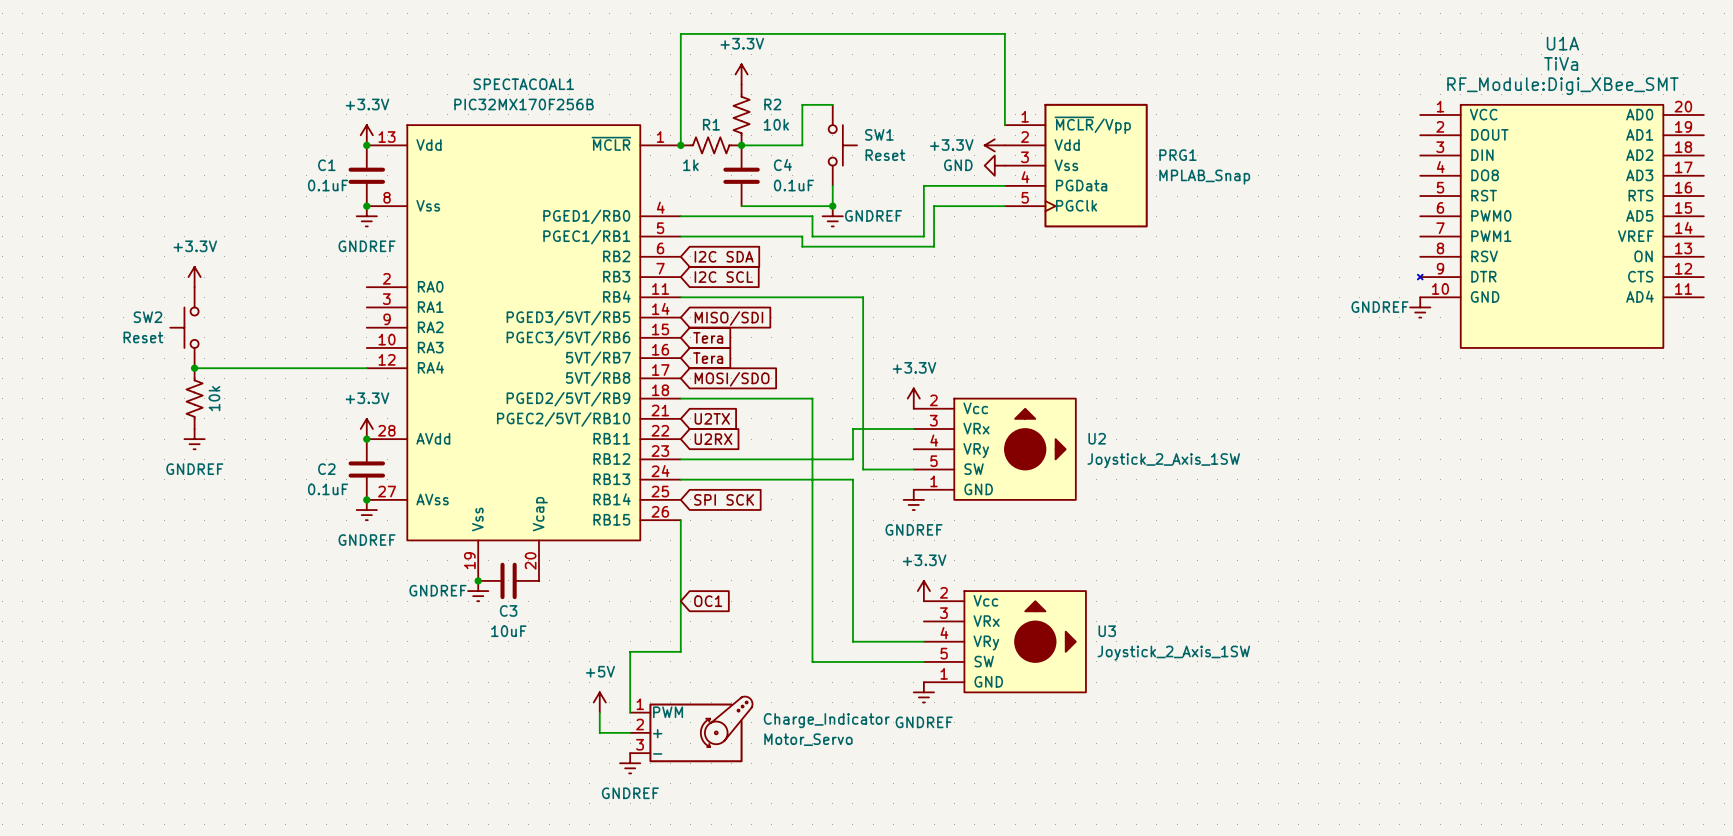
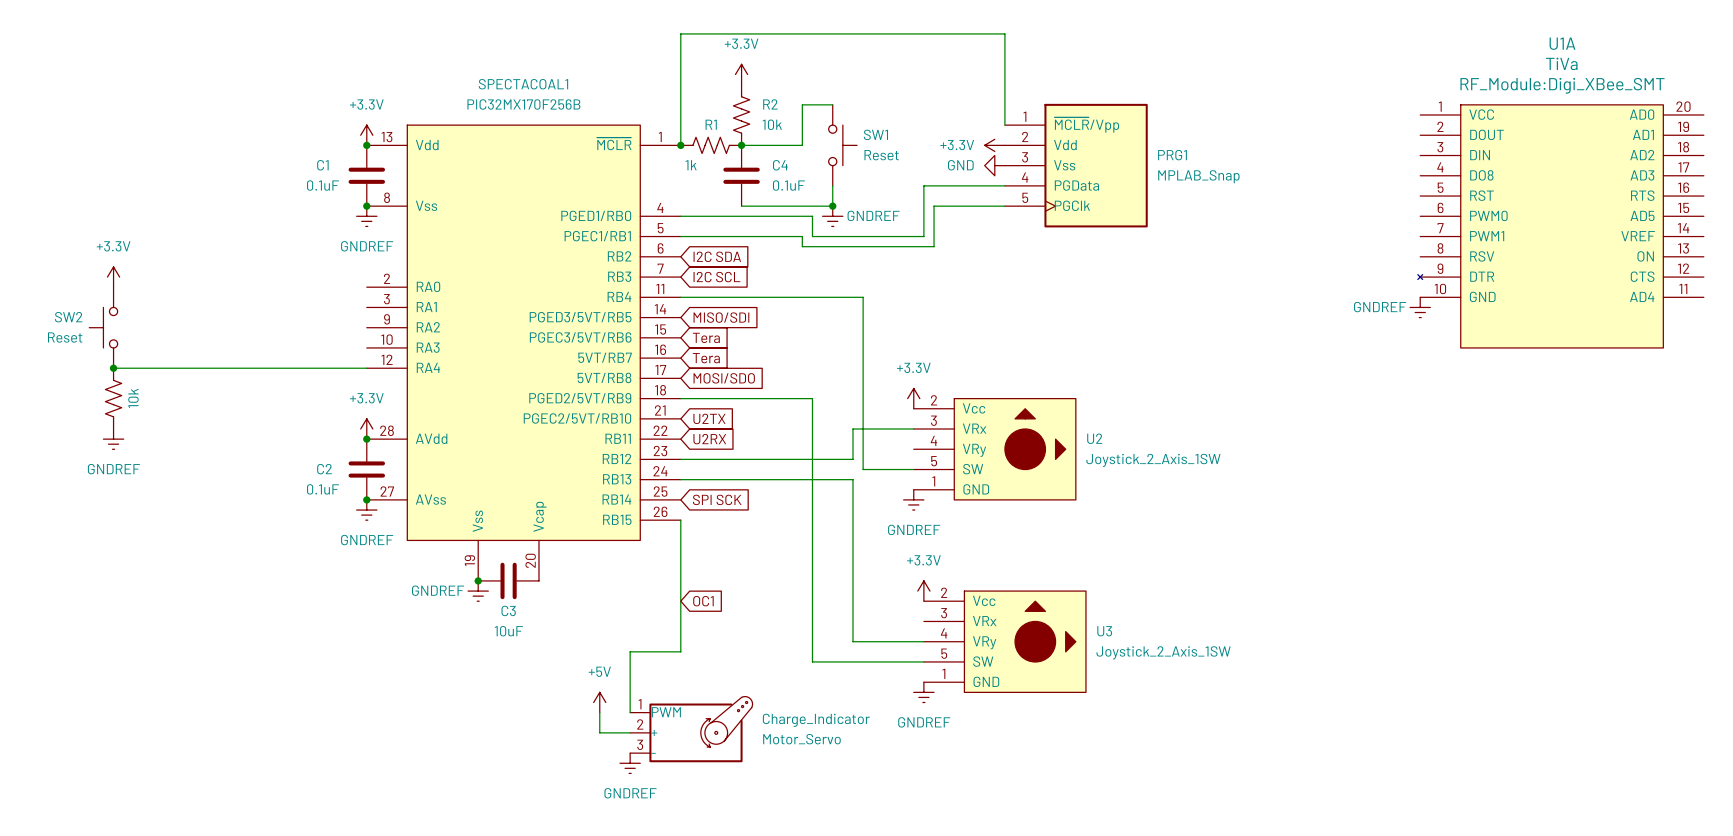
power symbol position: +3.3V (194, 277) -> +3.3V (113, 277)
SW2 position: (184, 327) -> (103, 327)
wire: none -> (113, 368) (194, 368)
junction: none -> (113, 368)
junction: (194, 368) -> none
part position: (194, 398) -> (113, 398)
power symbol position: GNDREF (194, 439) -> GNDREF (113, 439)

